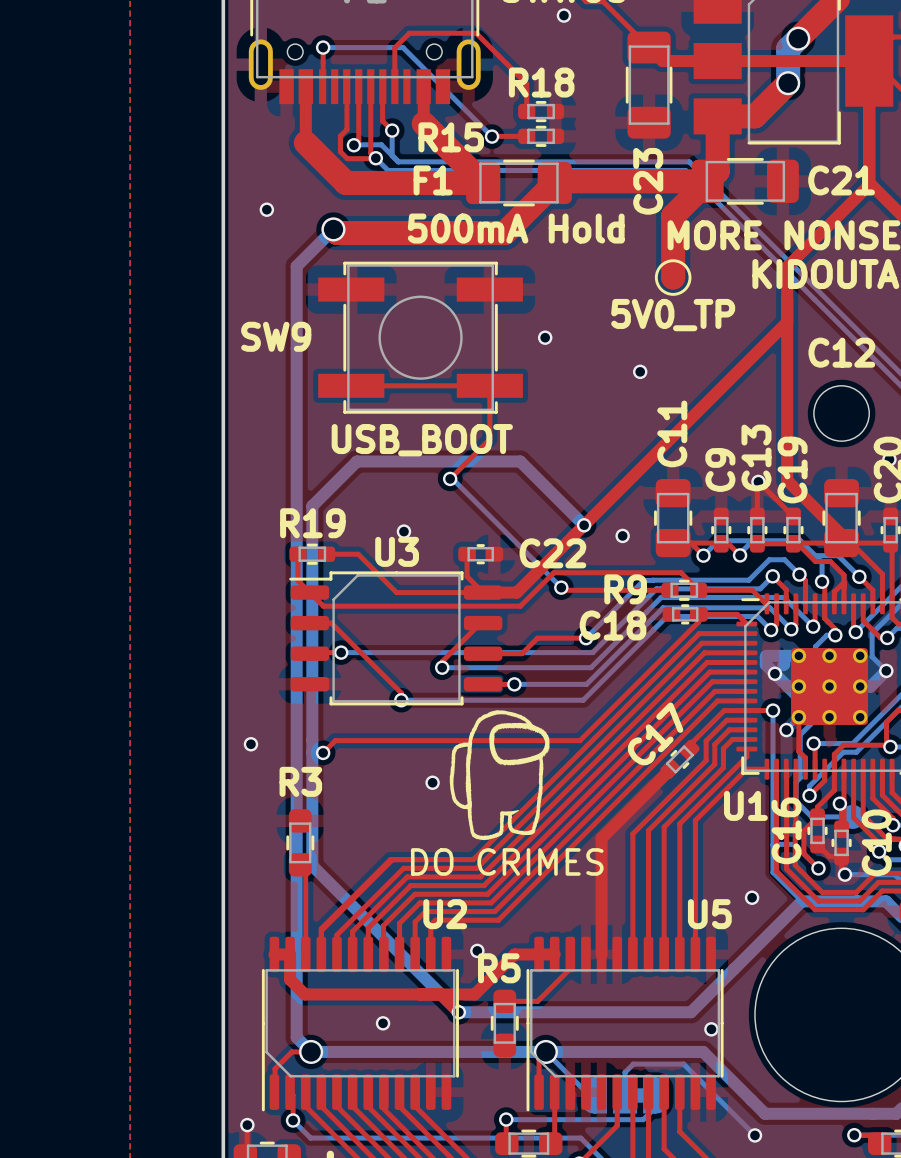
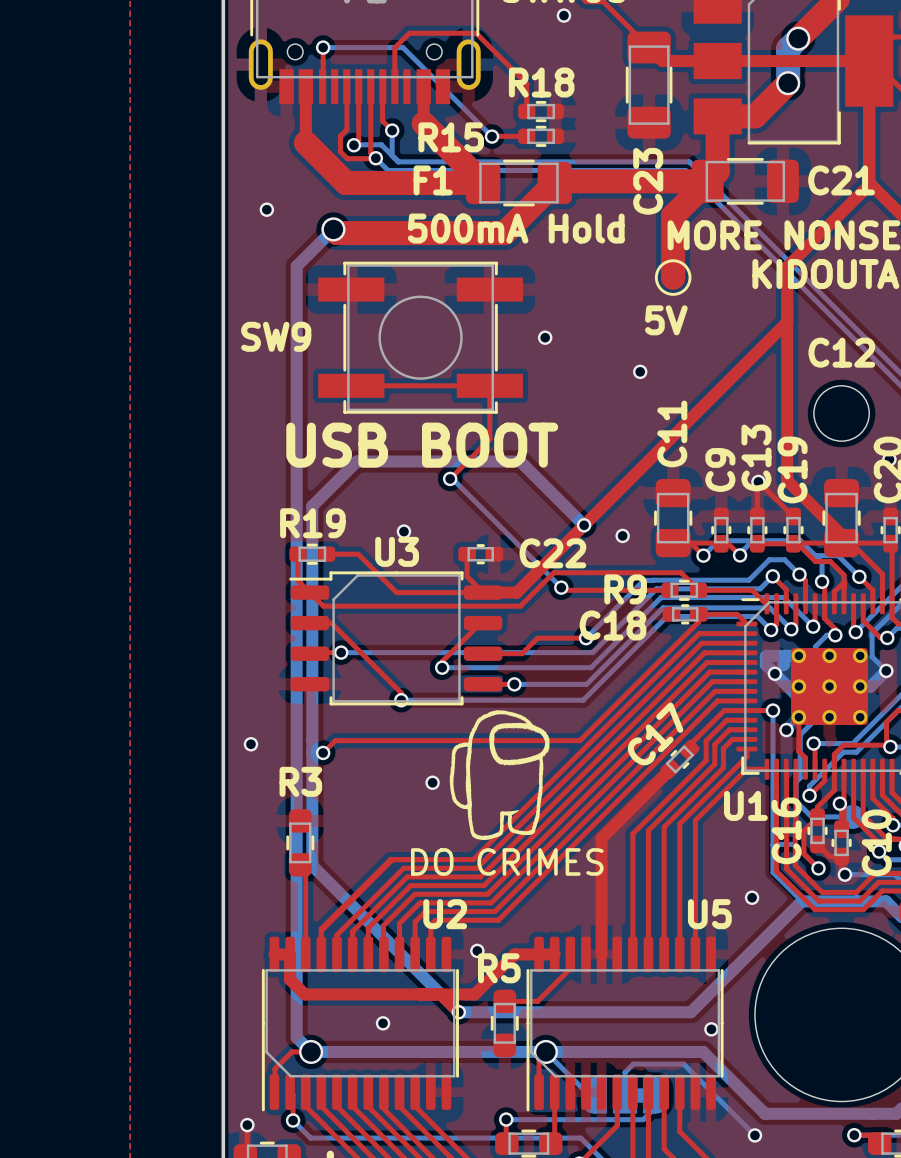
part value: 5V0_TP (673, 315) -> none
text: none -> 5V (666, 320)
SW9 value: USB_BOOT (422, 440) -> none
text: none -> USB BOOT (422, 445)

